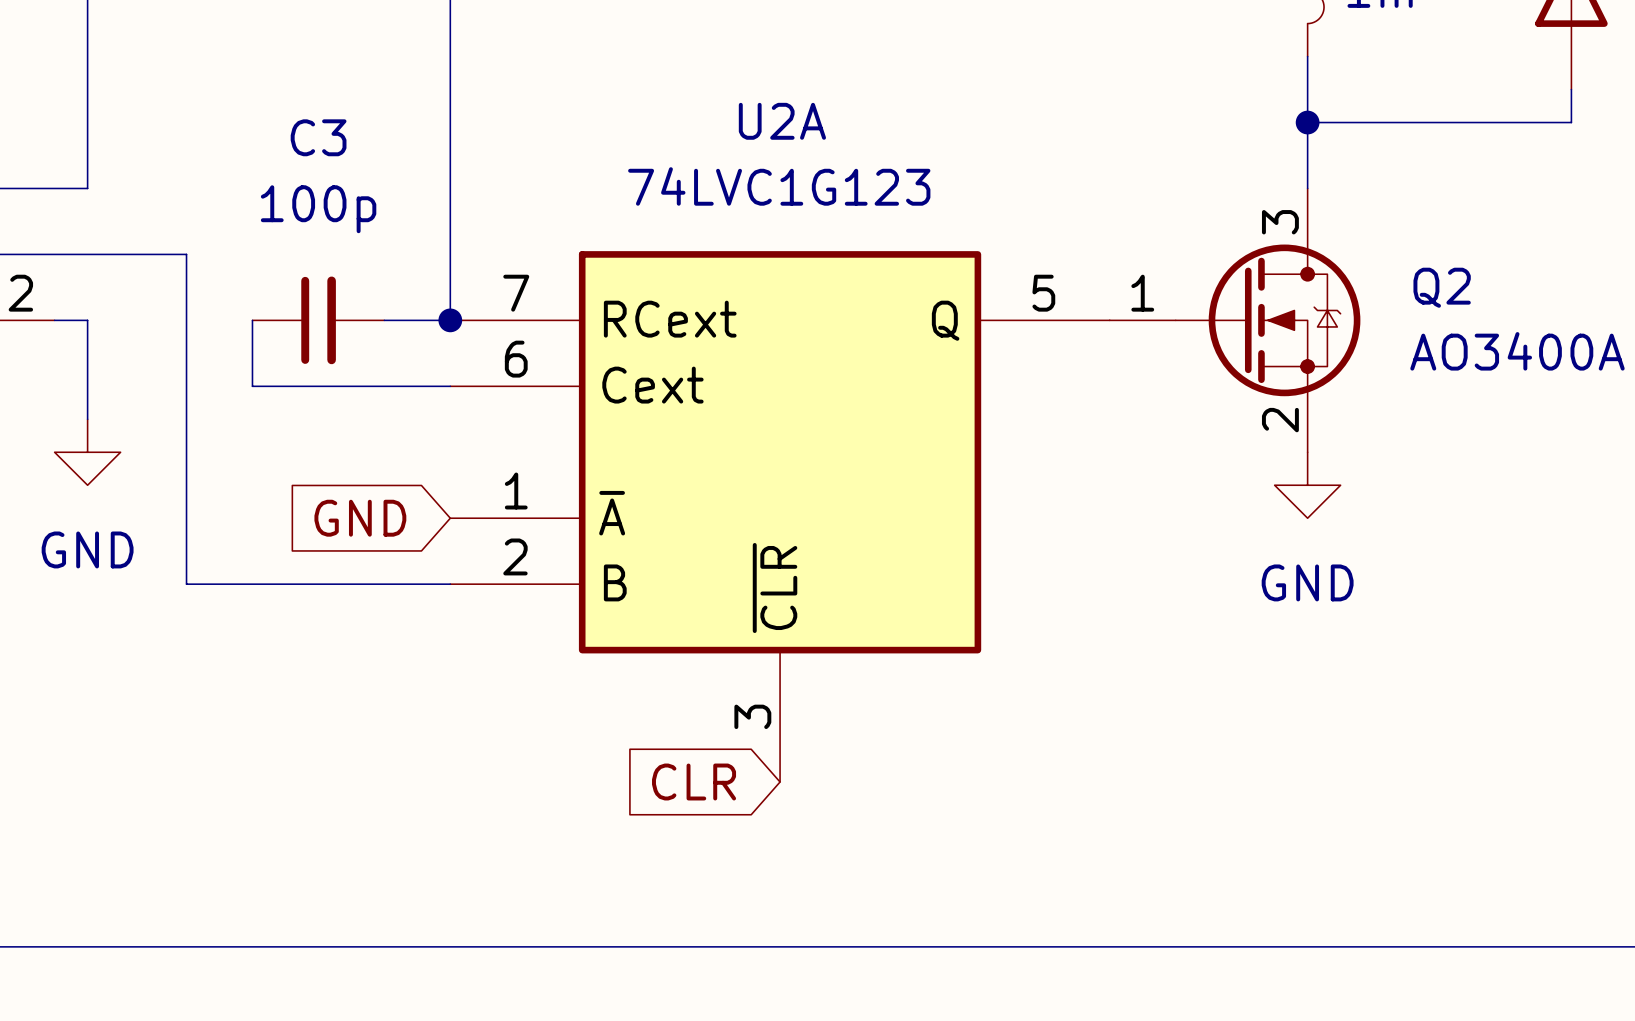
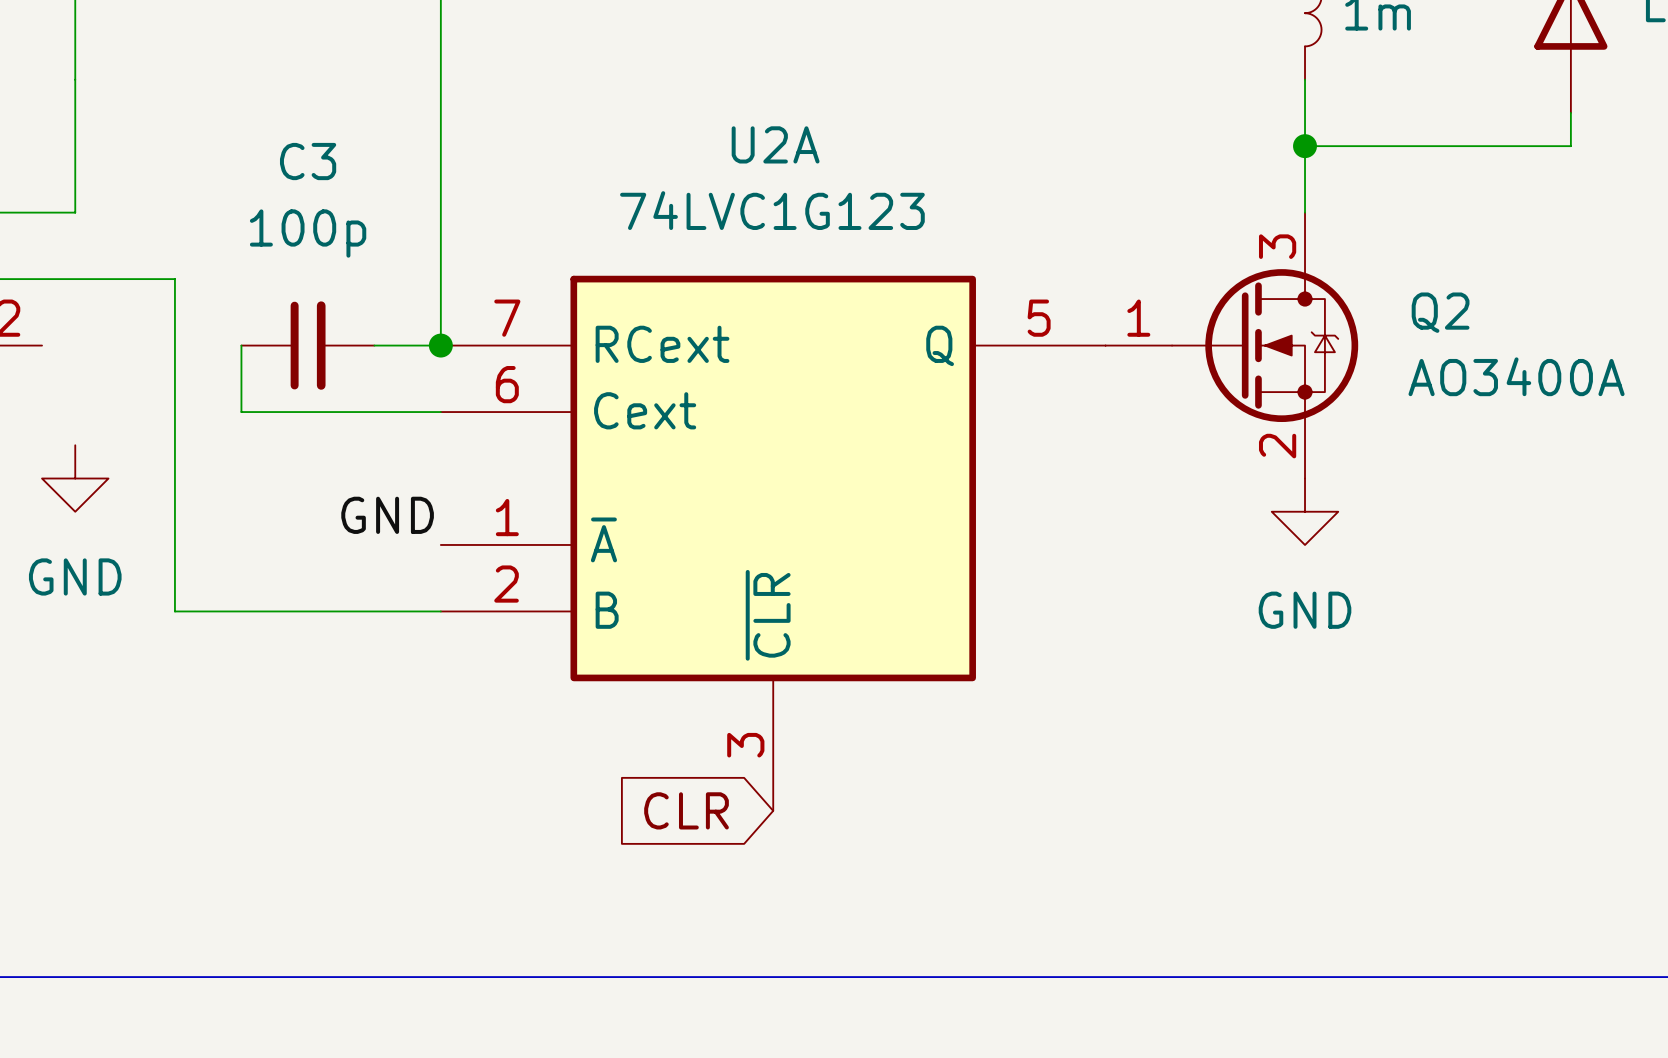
wire: (54, 320) (87, 320) (87, 419) -> none
label: none -> GND (387, 515)
global label: GND (360, 518) -> none

